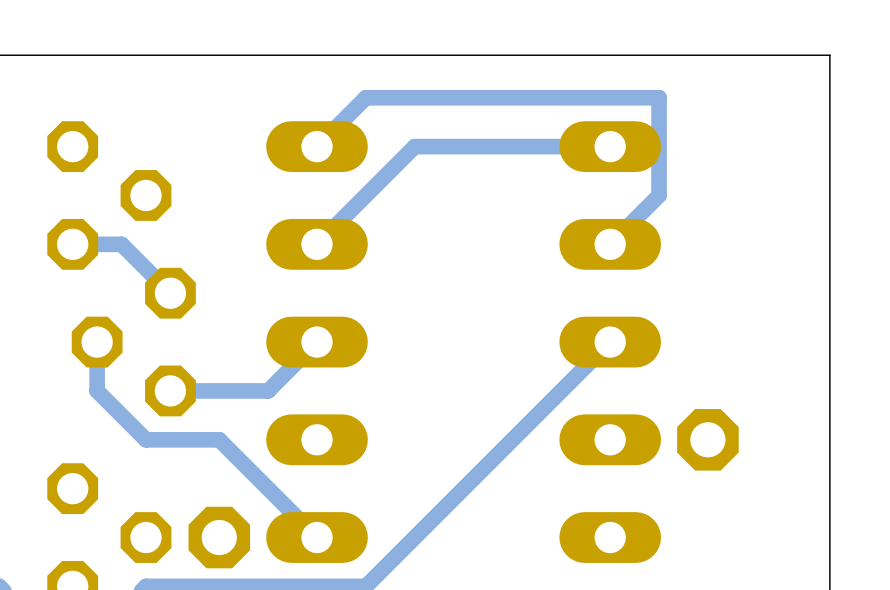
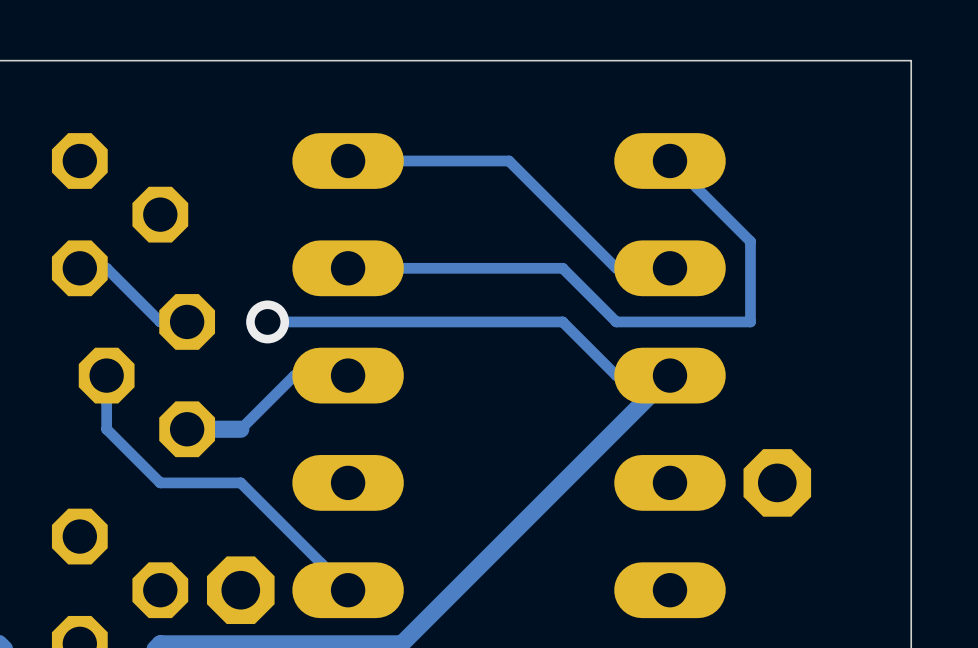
track: (317, 146) (365, 97) (659, 97) (659, 195) (610, 244) -> none
track: (414, 146) (317, 244) -> (455, 160) (348, 160)
track width: thick (463, 146) (414, 146) -> thin (509, 160) (455, 160)
track: (610, 146) (463, 146) -> (670, 268) (616, 268) (509, 160)
track: none -> (670, 160) (750, 241) (750, 321) (616, 321) (562, 268) (348, 268)
track: (97, 244) (121, 244) (170, 293) -> (106, 268) (160, 321) (187, 321)
track: none -> (267, 321) (562, 321) (616, 375) (670, 375)
via: none -> (267, 321)
track width: thick (97, 342) (97, 390) (146, 439) (219, 439) (317, 537) -> thin (106, 375) (106, 429) (160, 482) (240, 482) (348, 590)
track: (317, 342) (268, 390) (219, 390) -> (348, 375) (294, 375) (240, 429)

